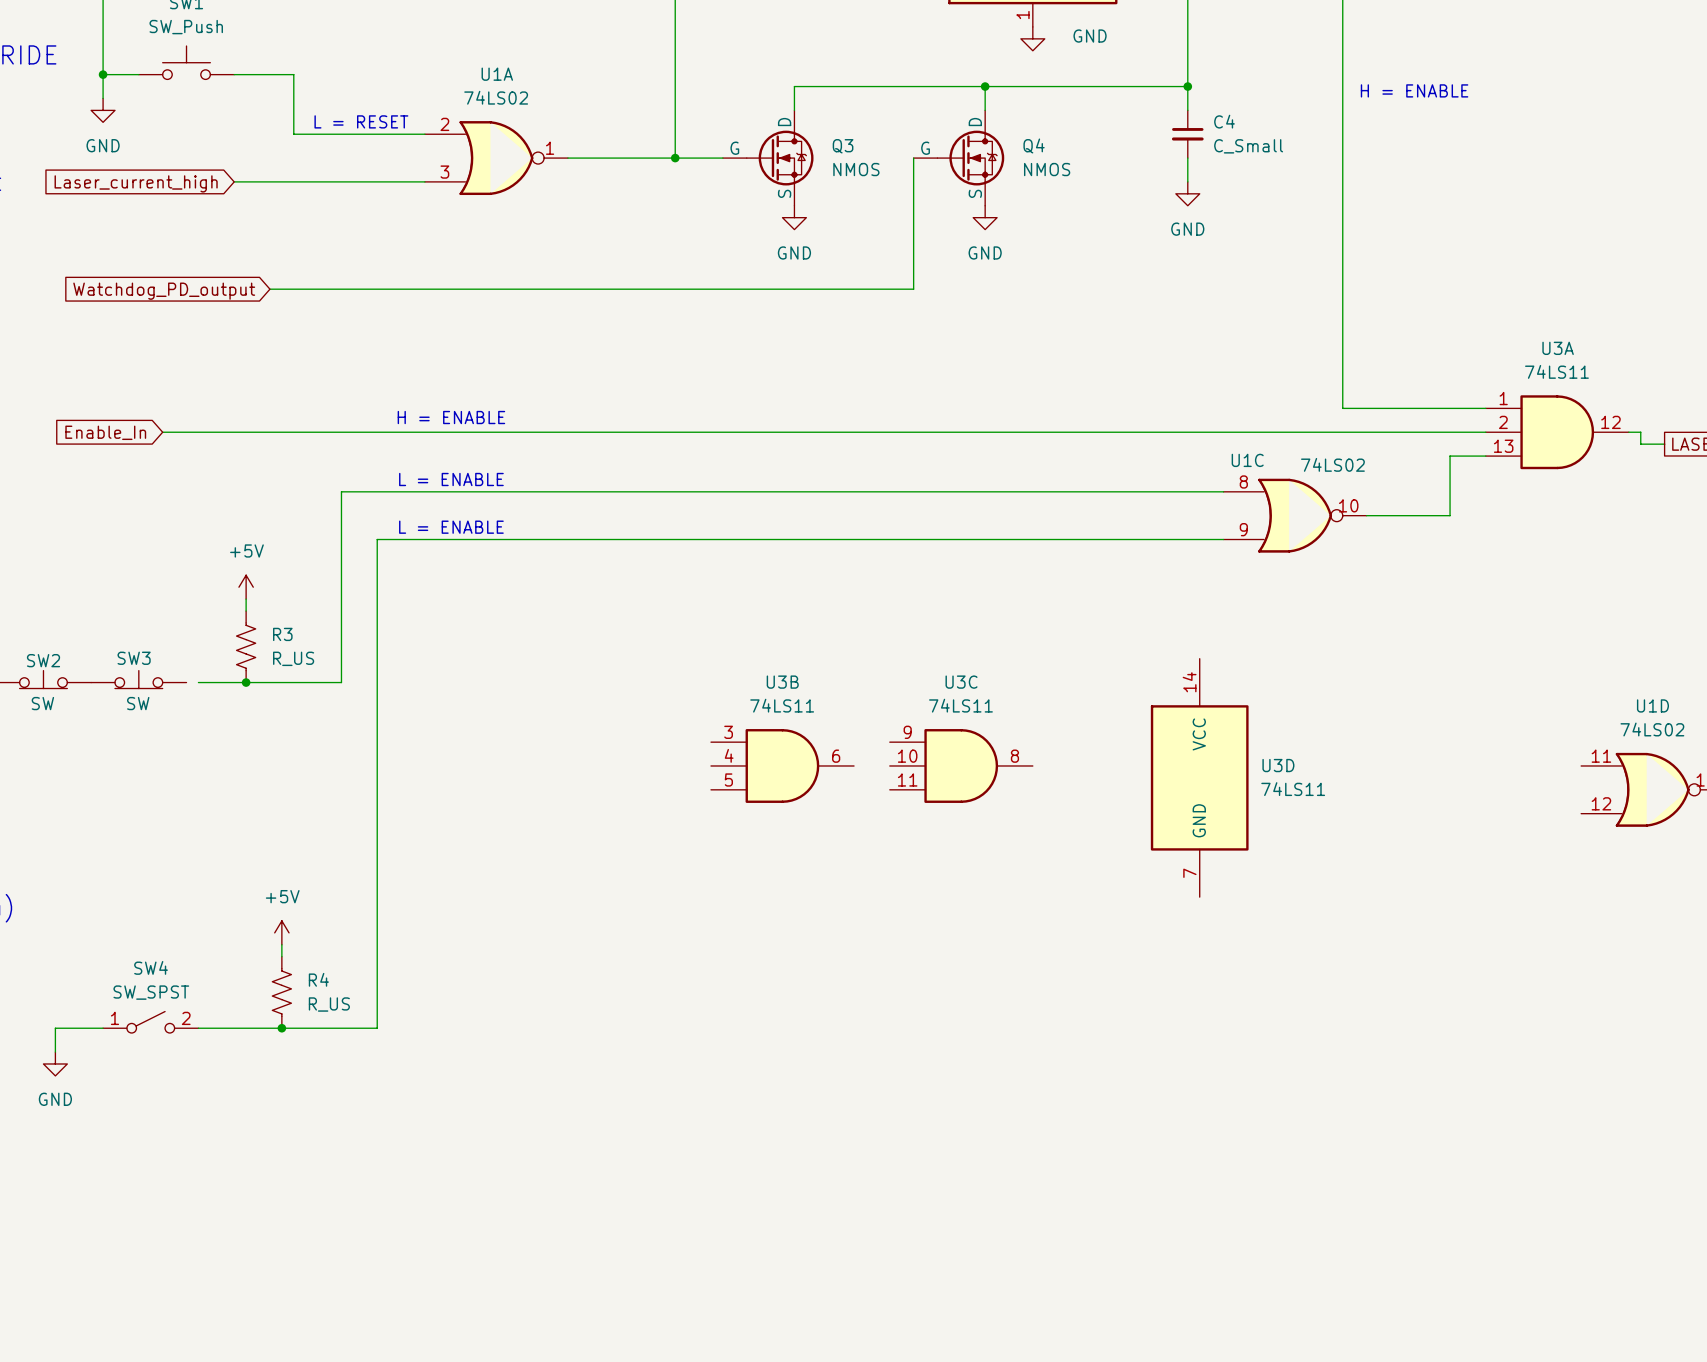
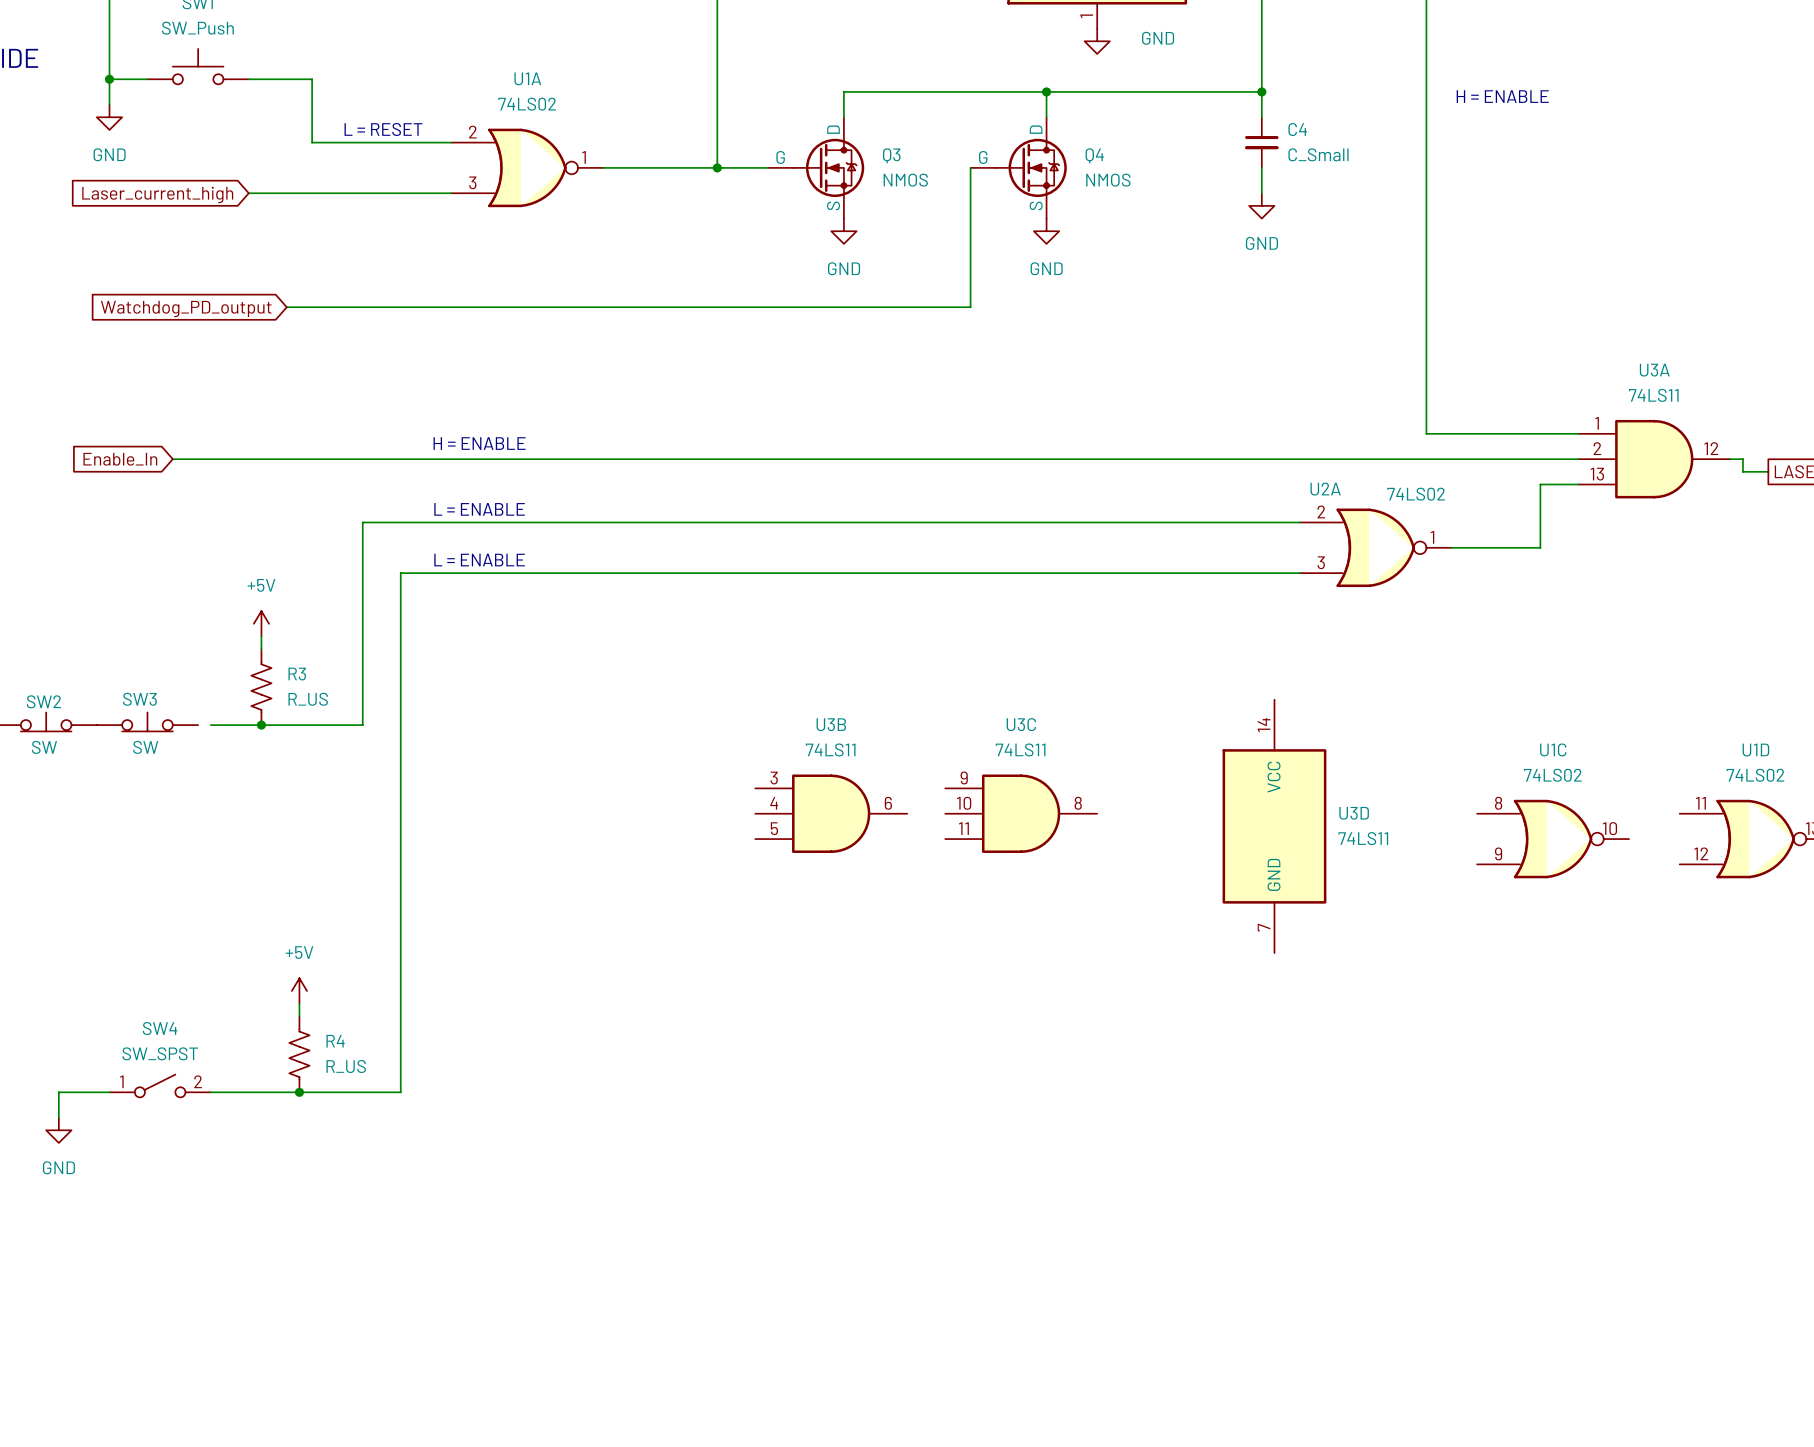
U1C name position: U1C (1247, 460) -> U1C (1553, 749)
U1C value position: 74LS02 (1332, 464) -> 74LS02 (1552, 775)
U1C position: (1295, 515) -> (1553, 839)
U2A: none -> 74LS02 (1375, 547)

